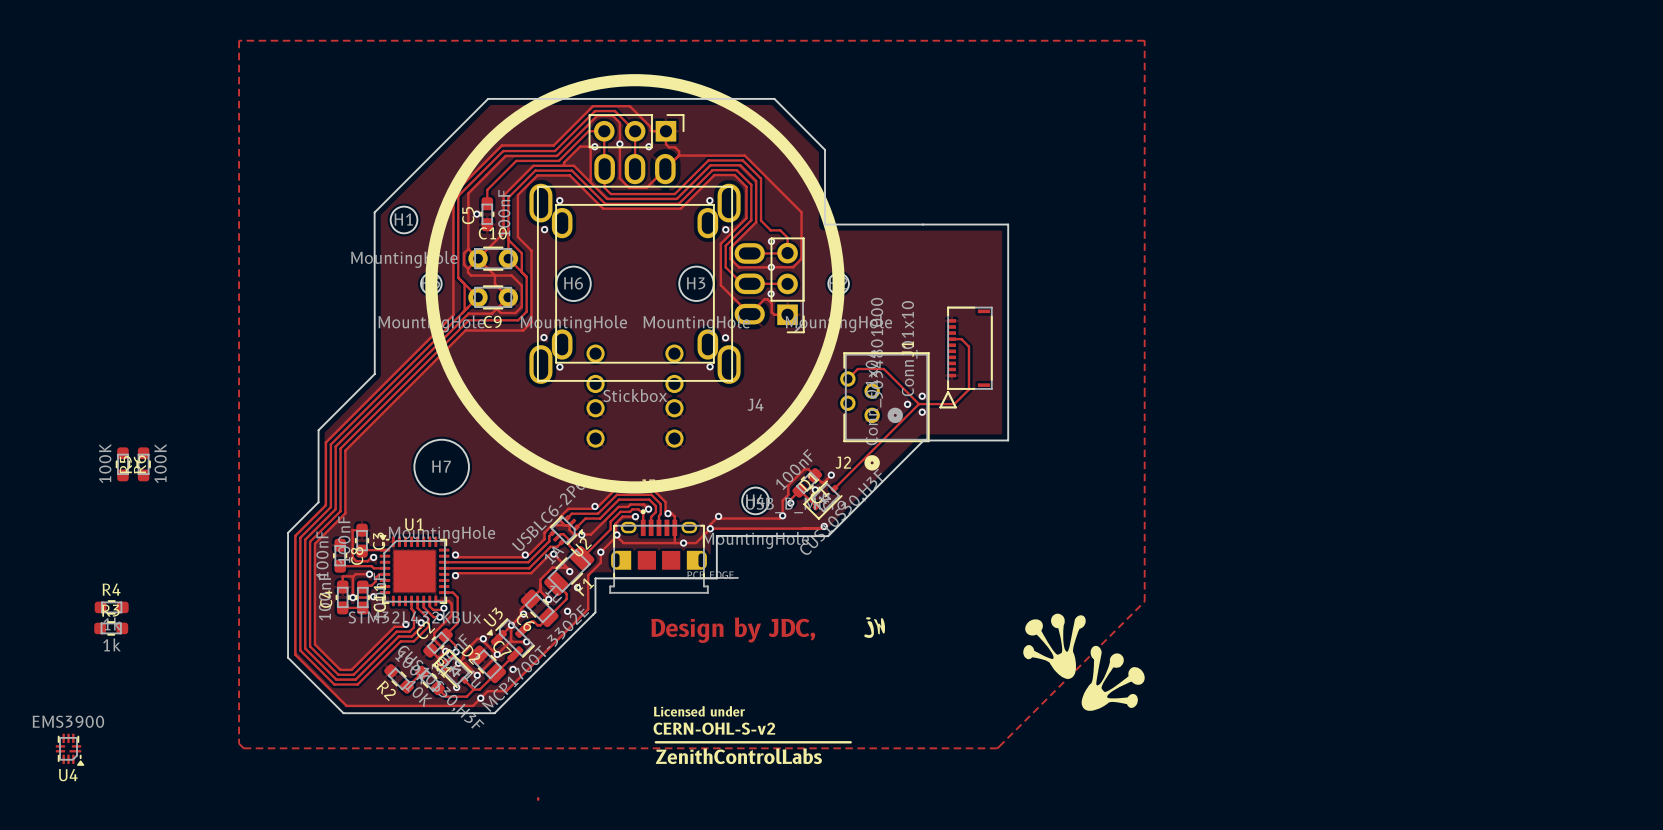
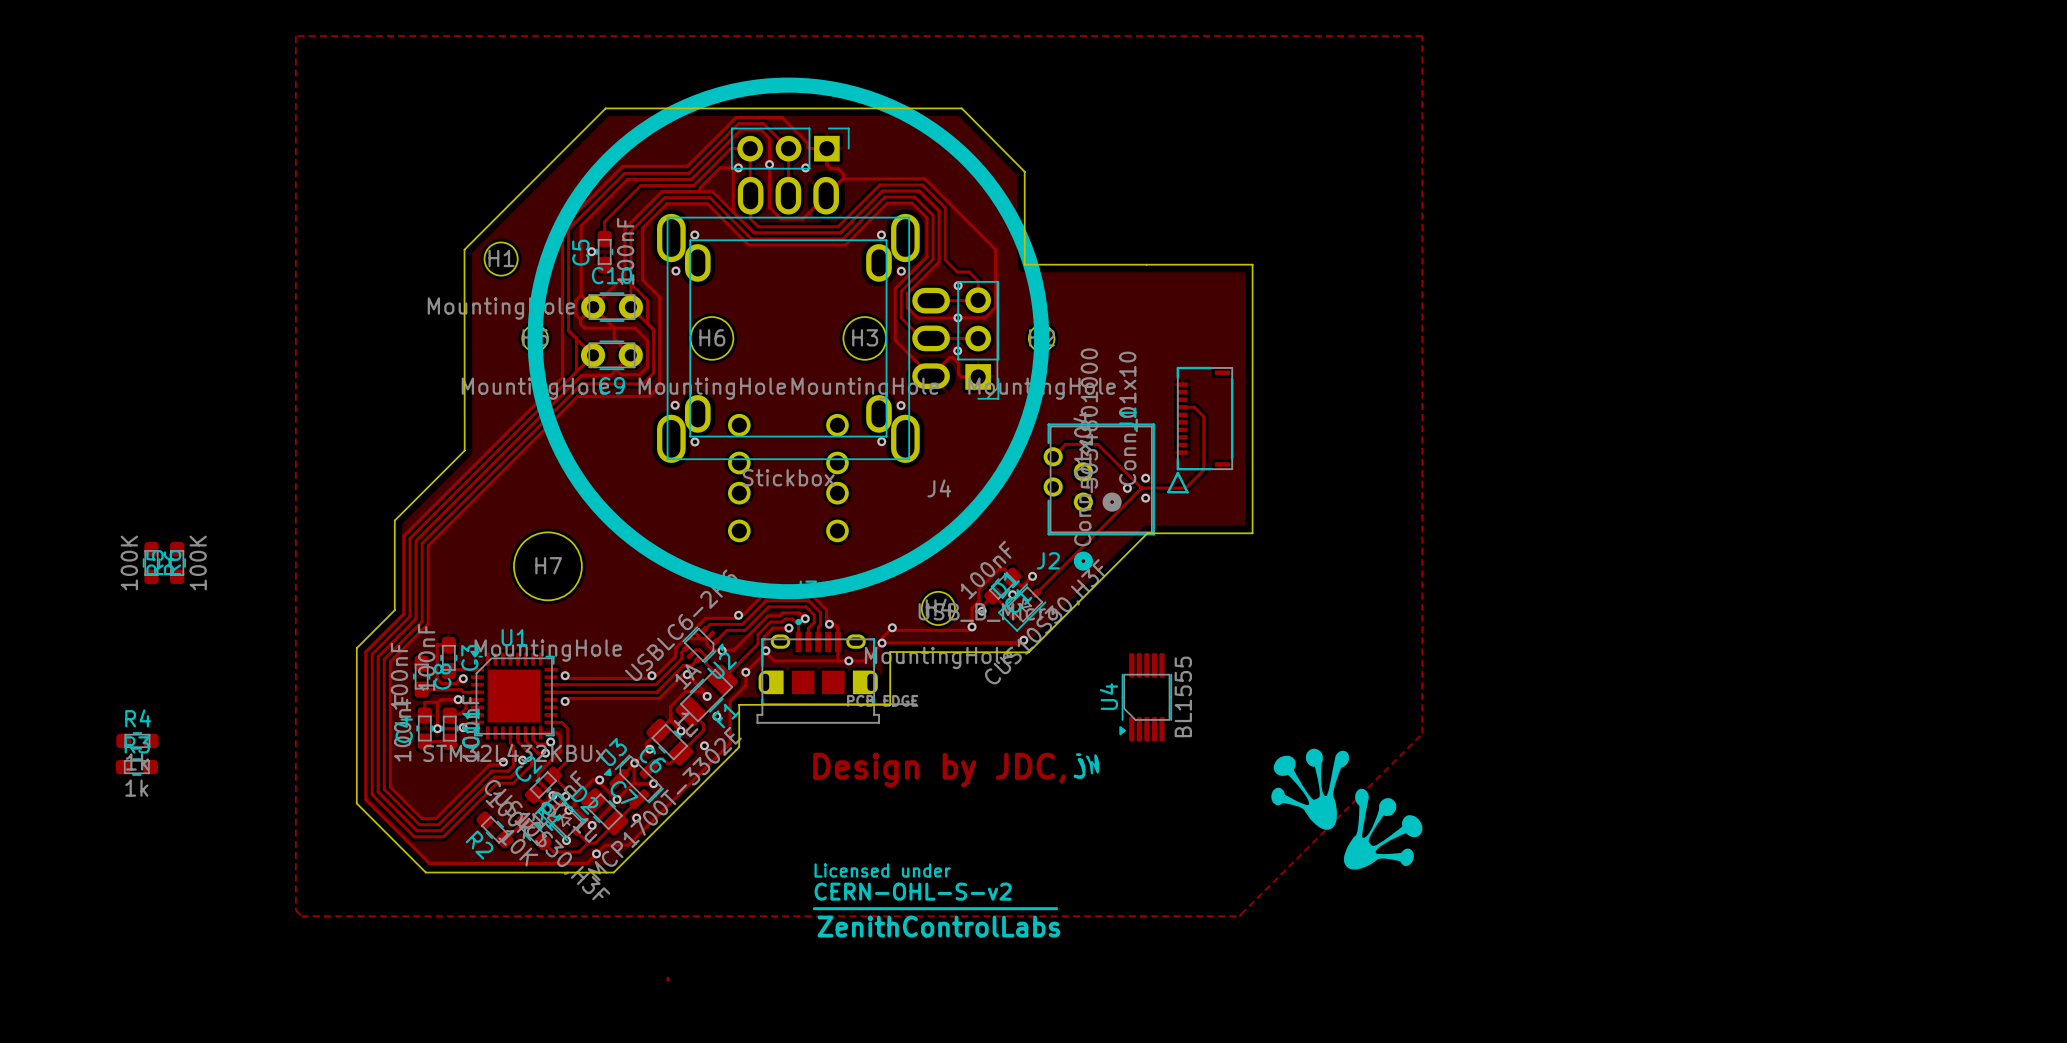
U4 value: EMS3900 (68, 721) -> BL1555 (1183, 696)
U4 footprint: [55, 733, 85, 766] -> [1119, 653, 1173, 742]
U4 name position: U4 (68, 775) -> U4 (1108, 696)

